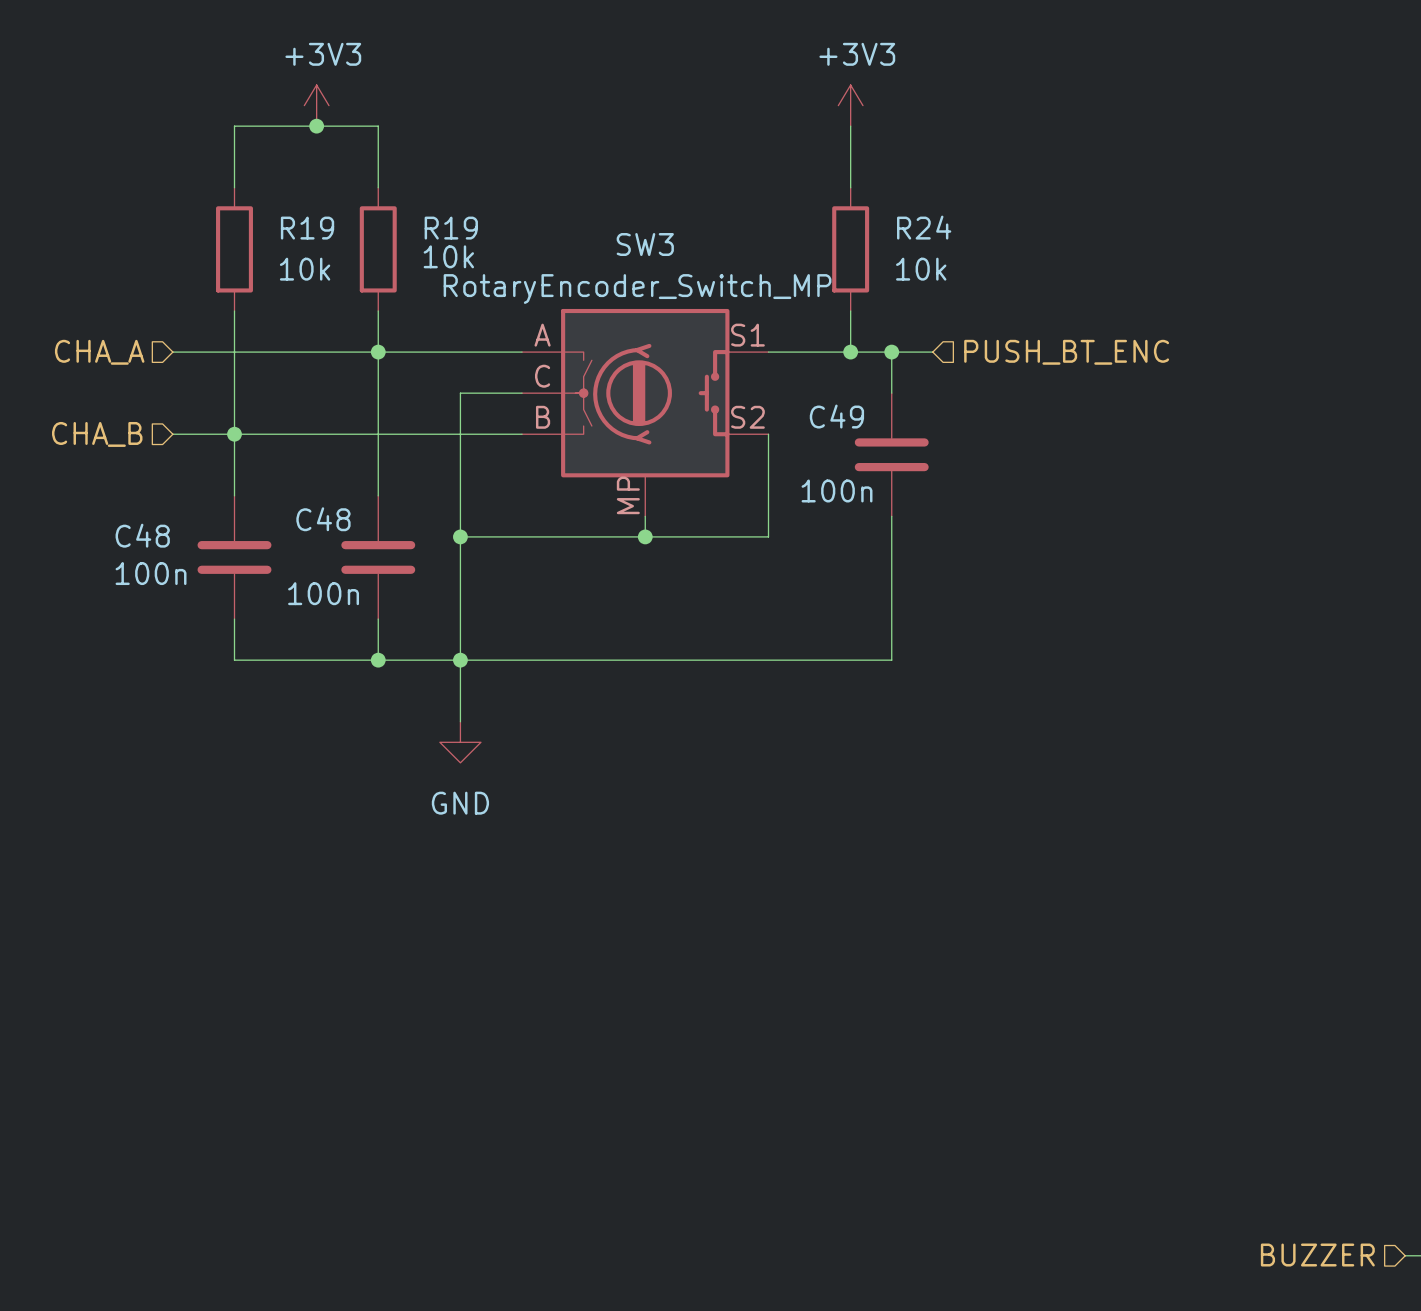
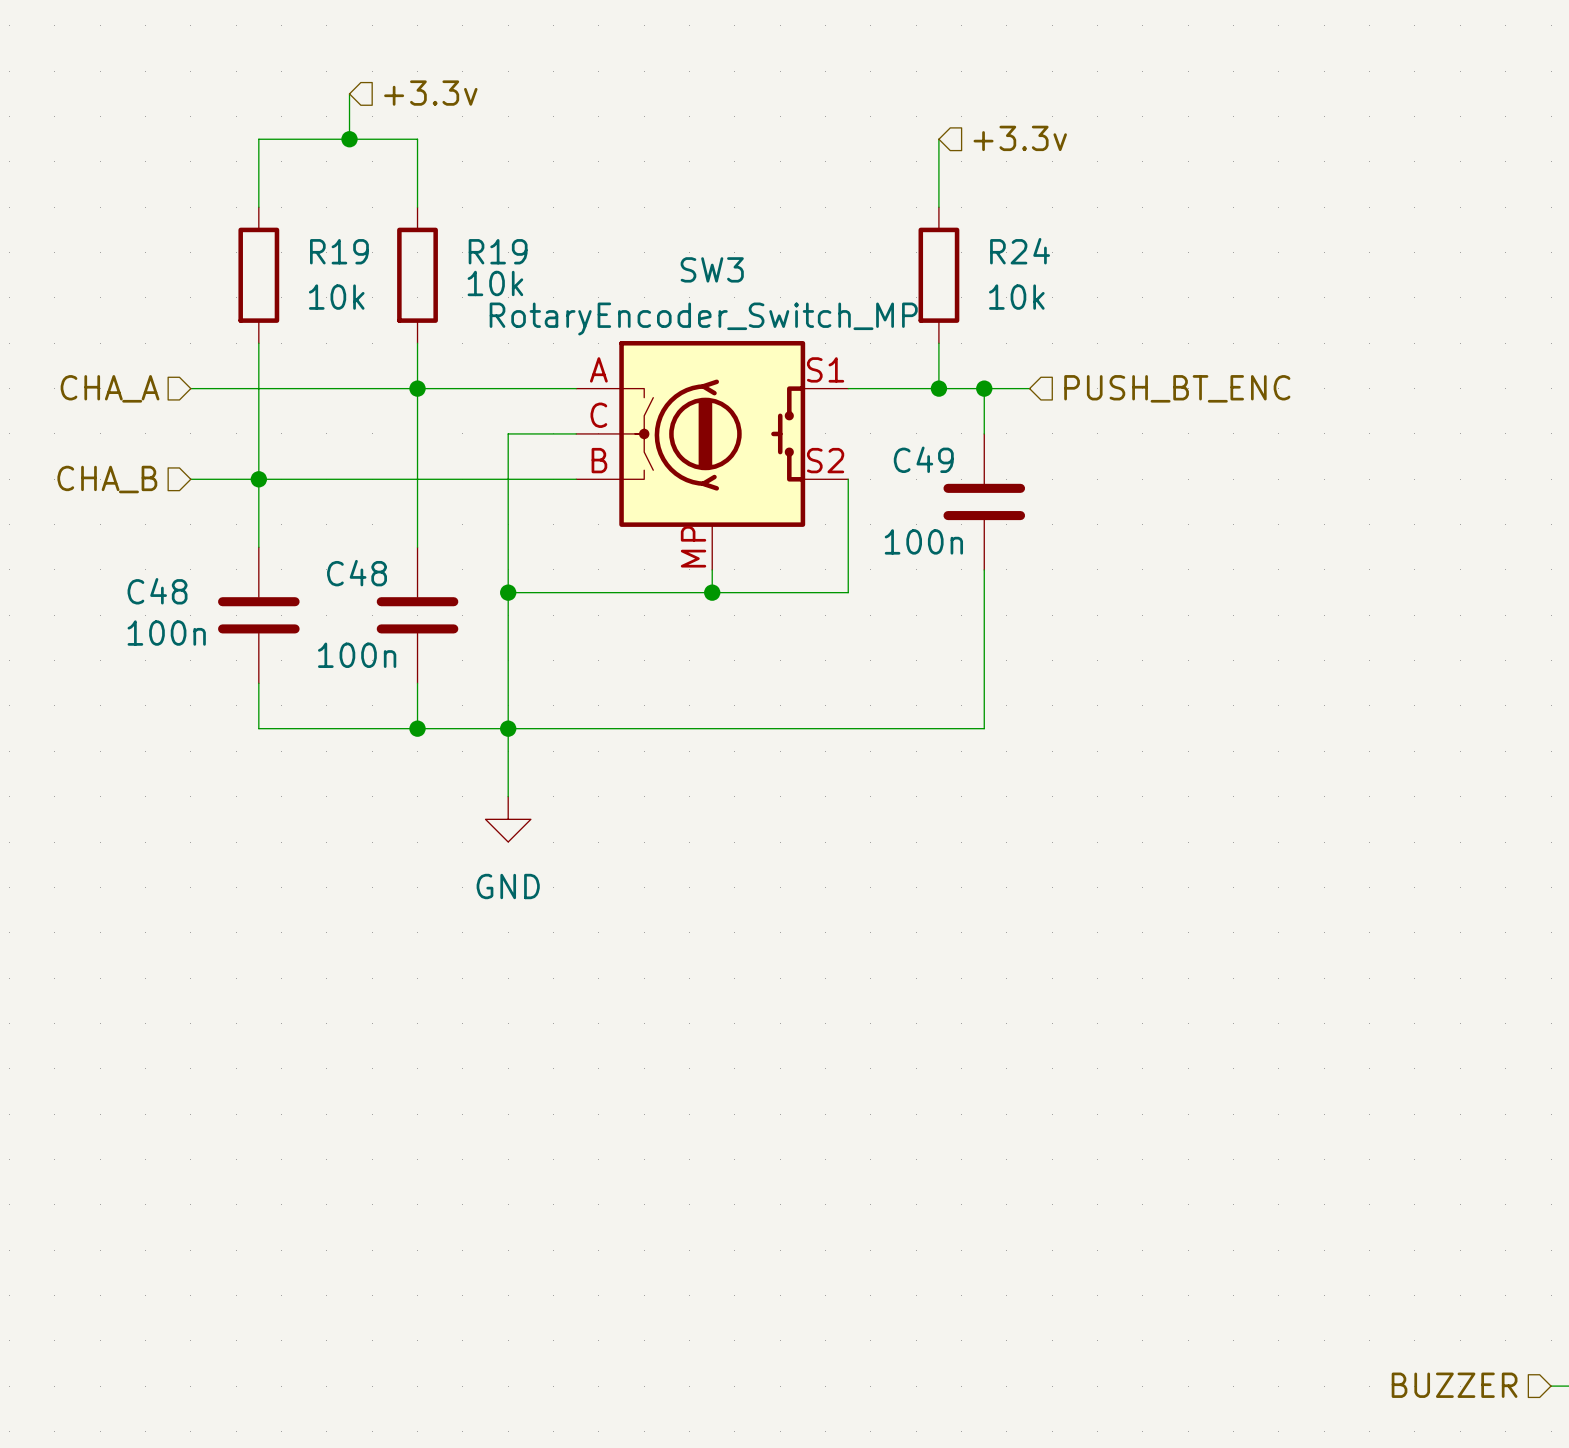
hierarchical label: none -> +3.3v (430, 93)
power symbol: +3V3 (316, 105) -> none
power symbol: +3V3 (850, 105) -> none
hierarchical label: none -> +3.3v (1020, 138)

